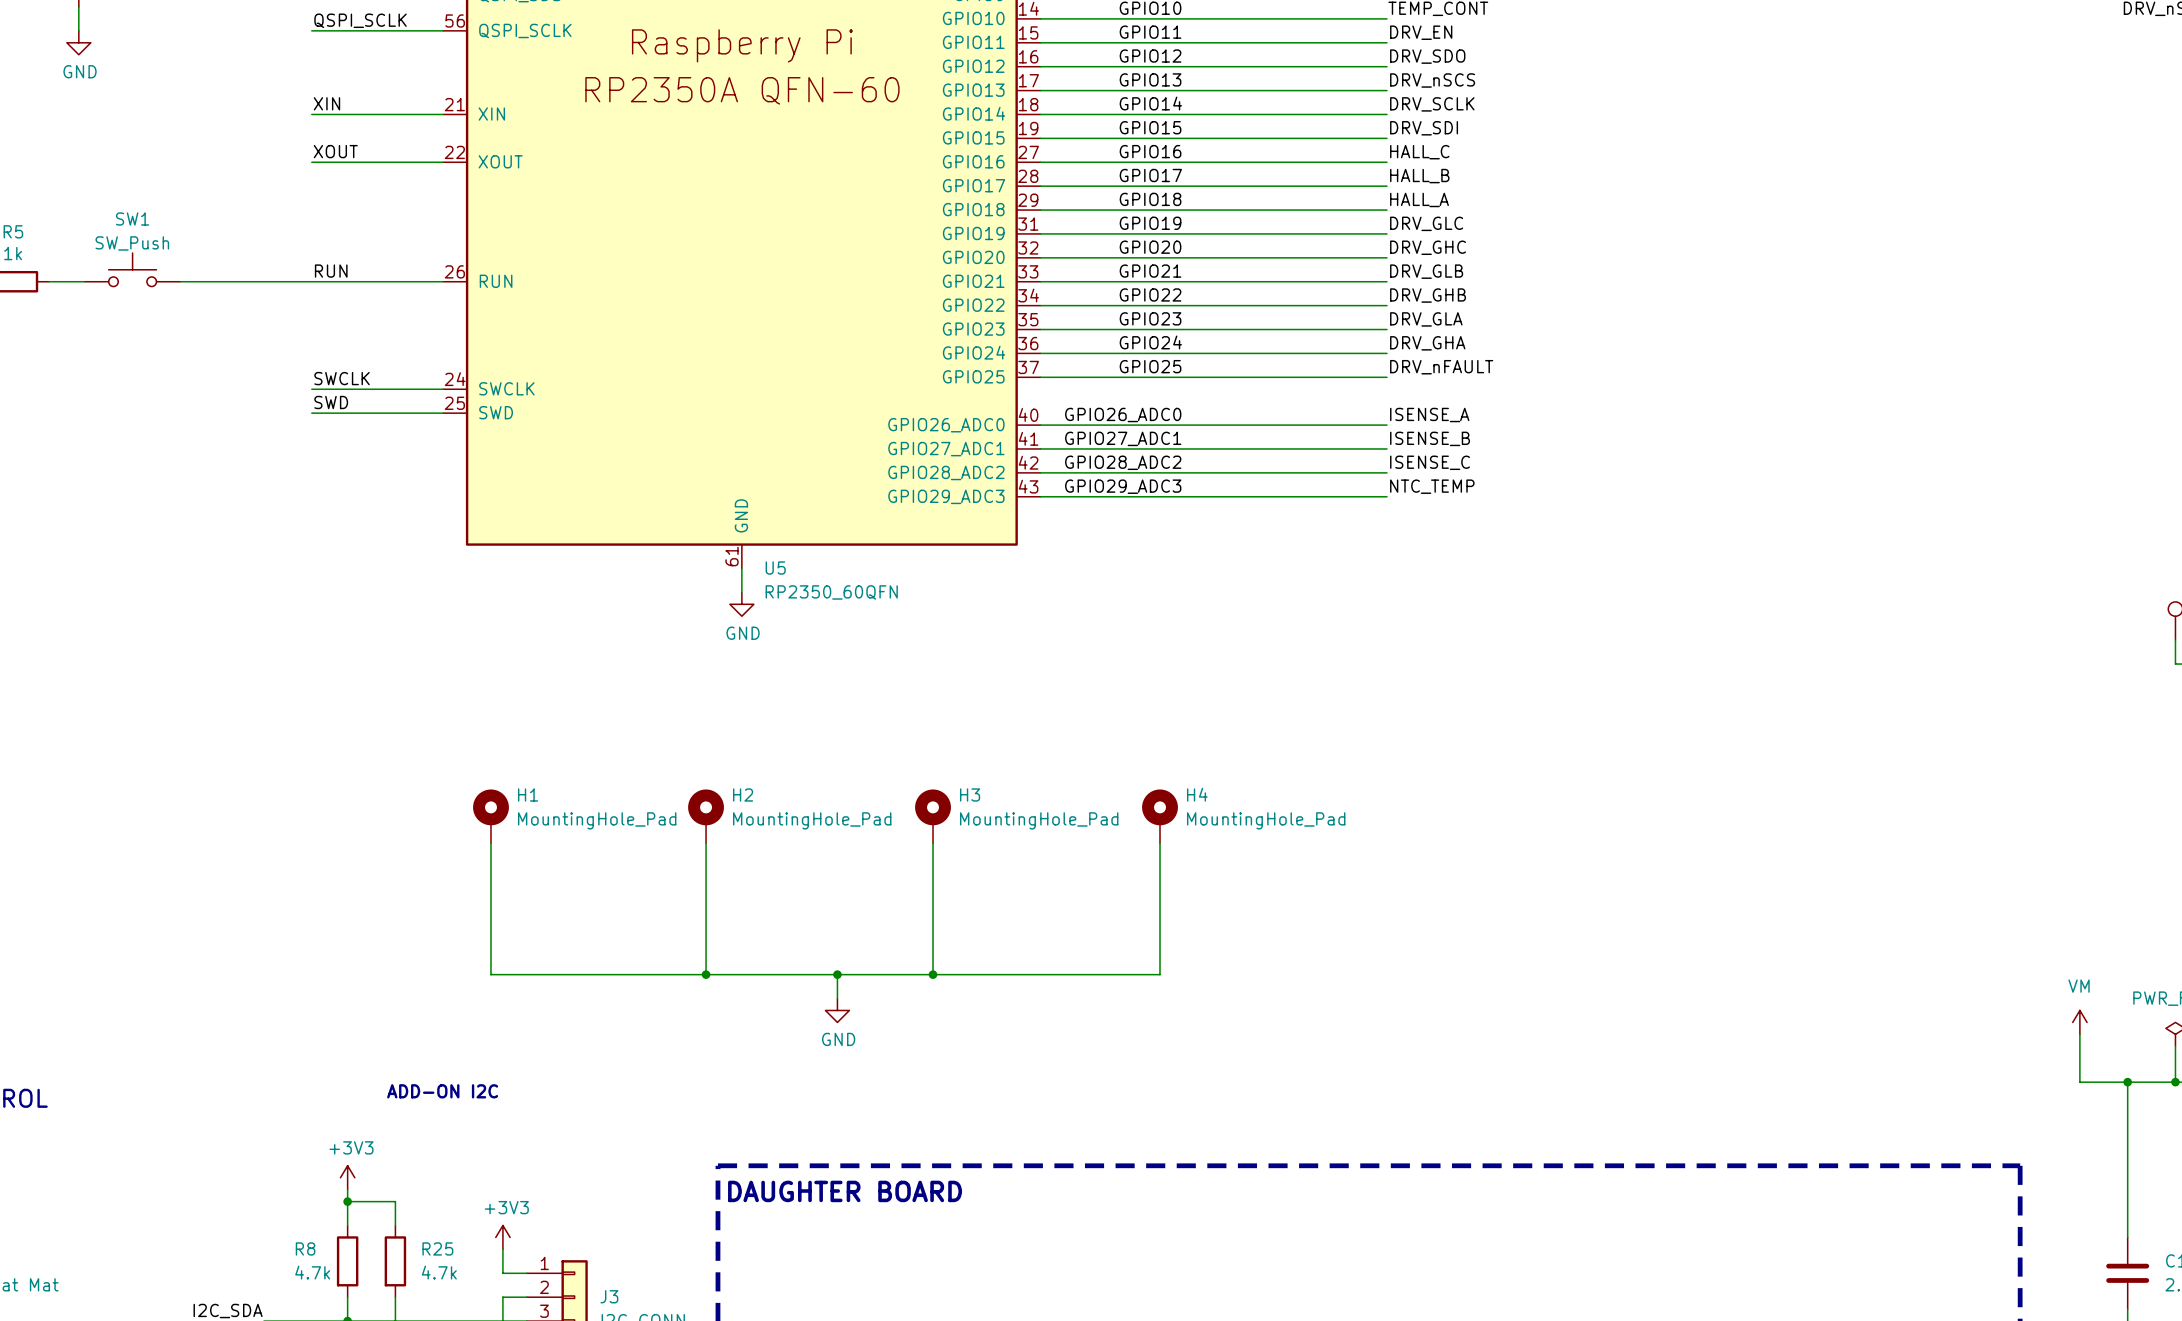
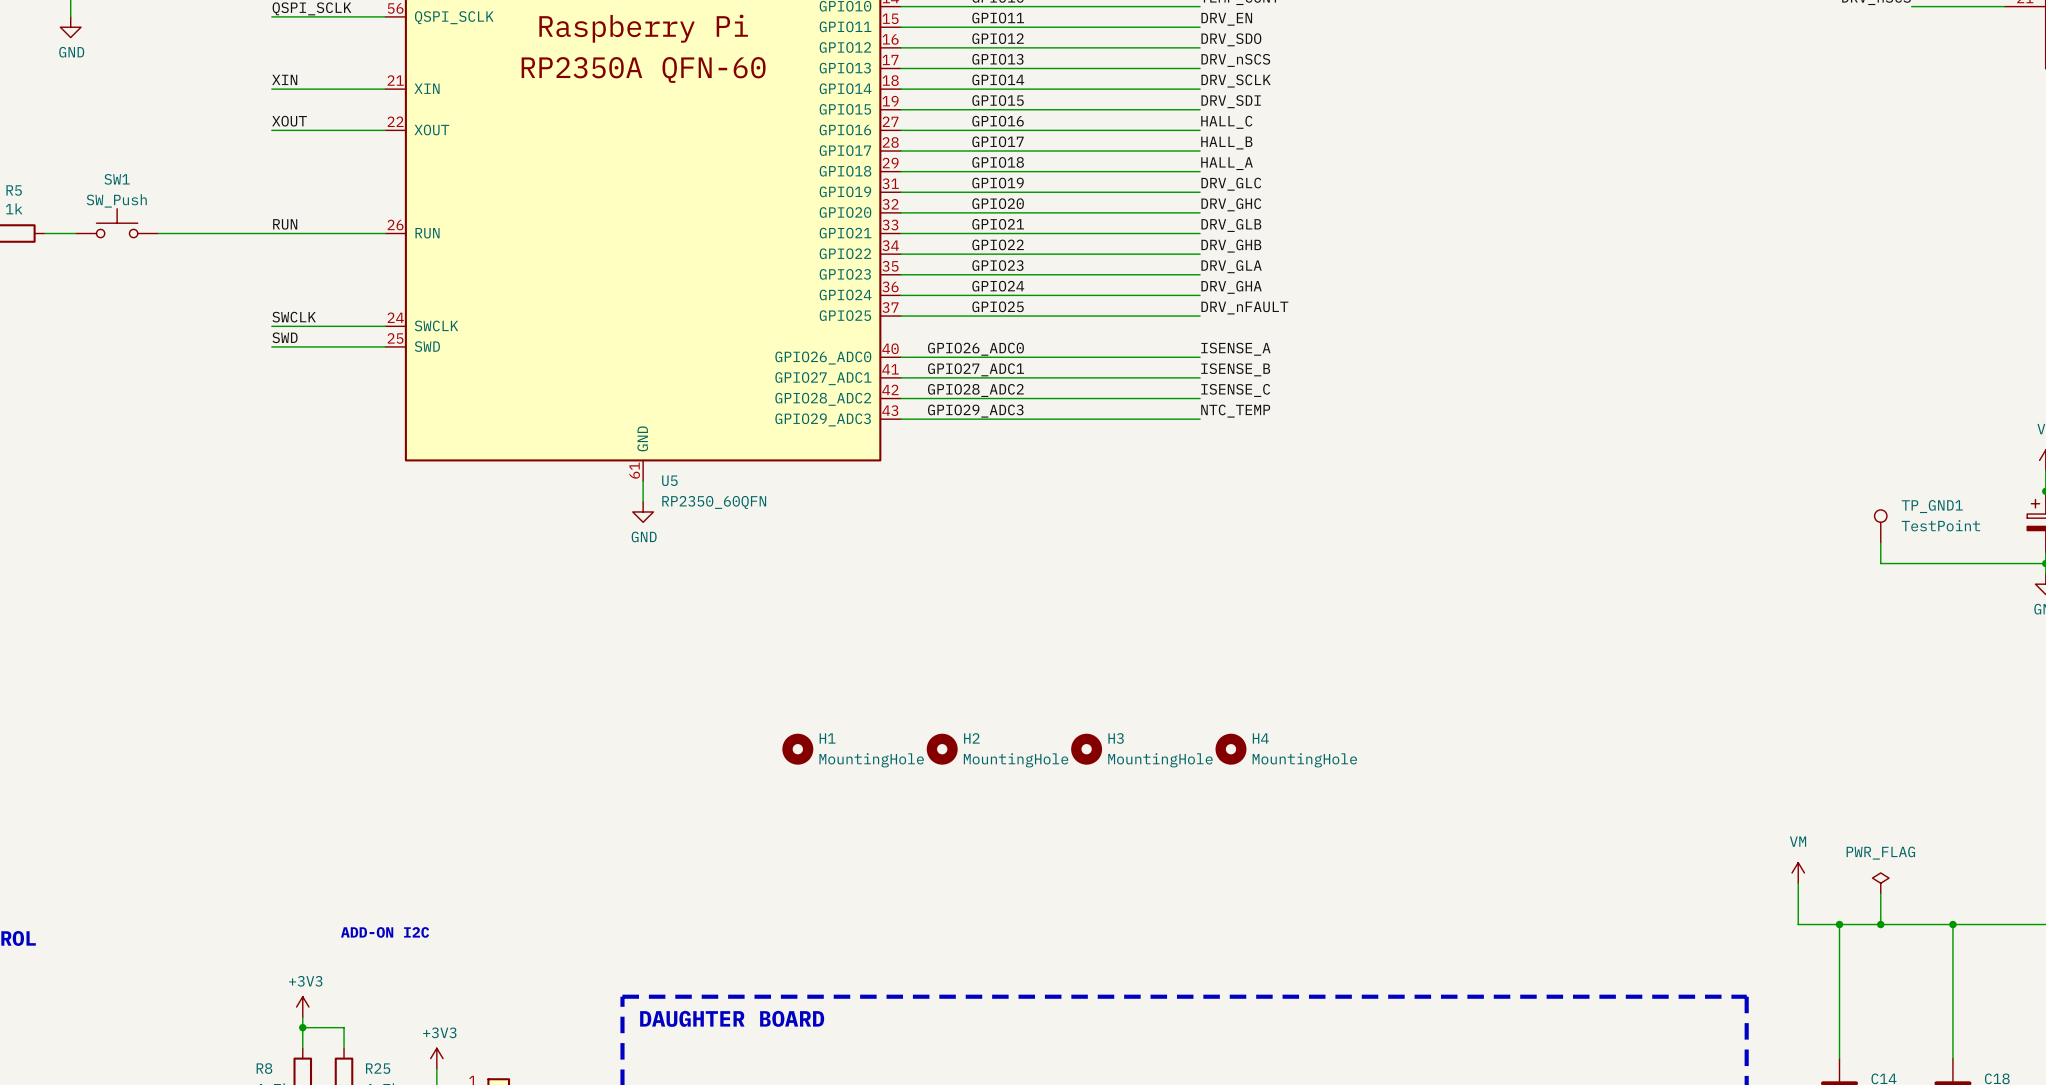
H1 symbol: [473, 789, 509, 844] -> [782, 733, 814, 765]
H2 symbol: [688, 789, 724, 844] -> [926, 733, 958, 765]
H3 symbol: [915, 789, 951, 844] -> [1071, 733, 1103, 765]
H4 symbol: [1142, 789, 1178, 844] -> [1215, 733, 1247, 765]
H1 value: MountingHole_Pad (597, 820) -> MountingHole (871, 760)
H2 value: MountingHole_Pad (812, 820) -> MountingHole (1016, 760)
H3 value: MountingHole_Pad (1039, 820) -> MountingHole (1160, 760)
H4 value: MountingHole_Pad (1266, 820) -> MountingHole (1304, 760)
wire: (490, 843) (490, 974) (1160, 974) (1160, 843) -> none
wire: (706, 843) (706, 974) -> none
wire: (933, 843) (933, 974) -> none
junction: (706, 974) -> none
wire: (837, 974) (837, 998) -> none
junction: (837, 974) -> none
junction: (933, 974) -> none
power symbol: GND (837, 1010) -> none

